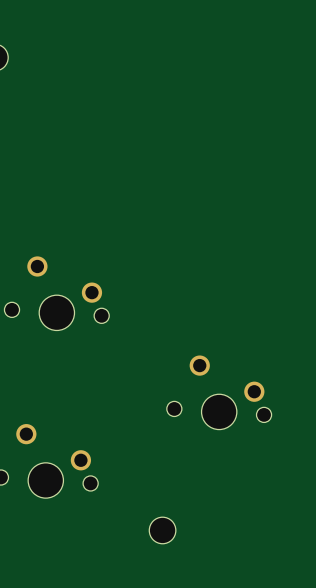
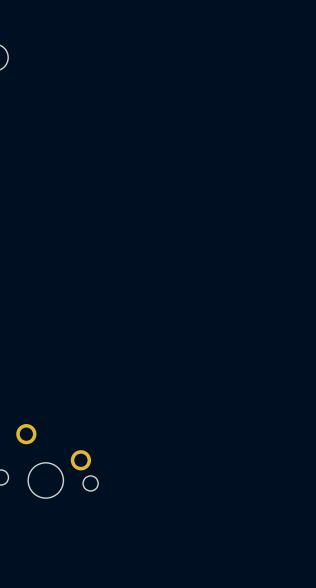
part: (56, 293) -> none
part: (219, 392) -> none
part: (162, 530) -> none

